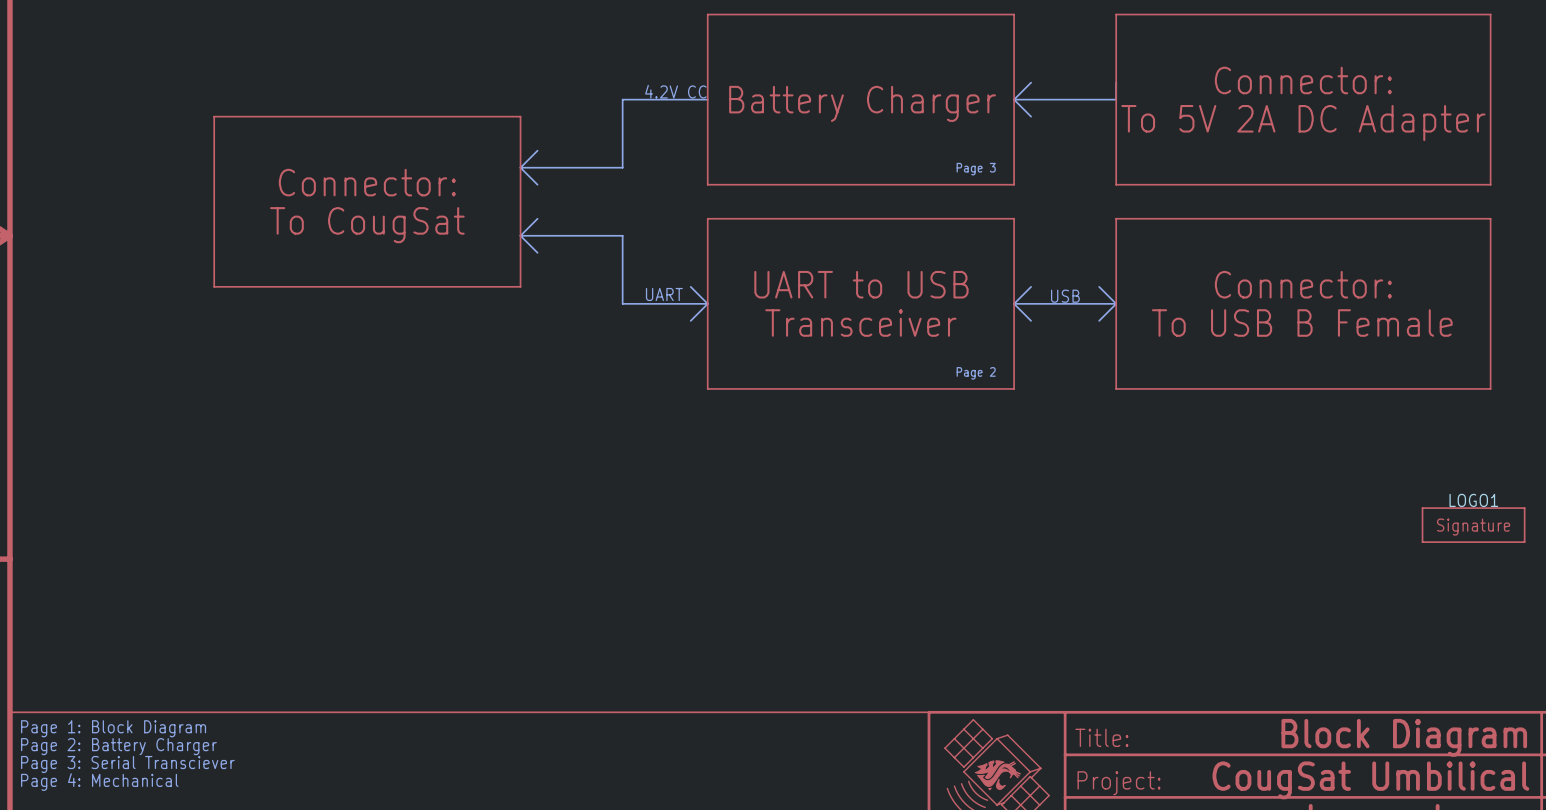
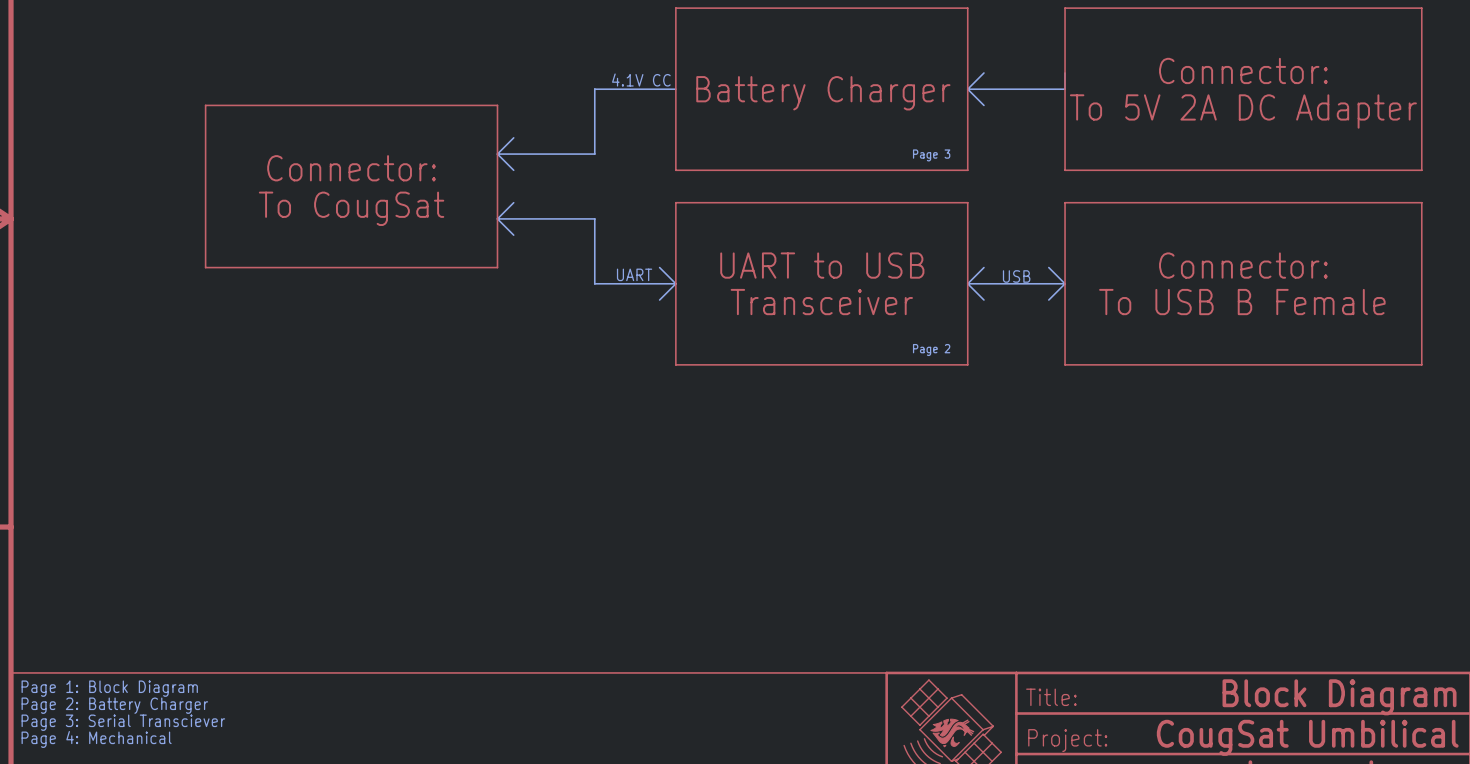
text: 4.2V CC (675, 91) -> 4.1V CC (641, 80)
LOGO1: (1473, 525) -> none

